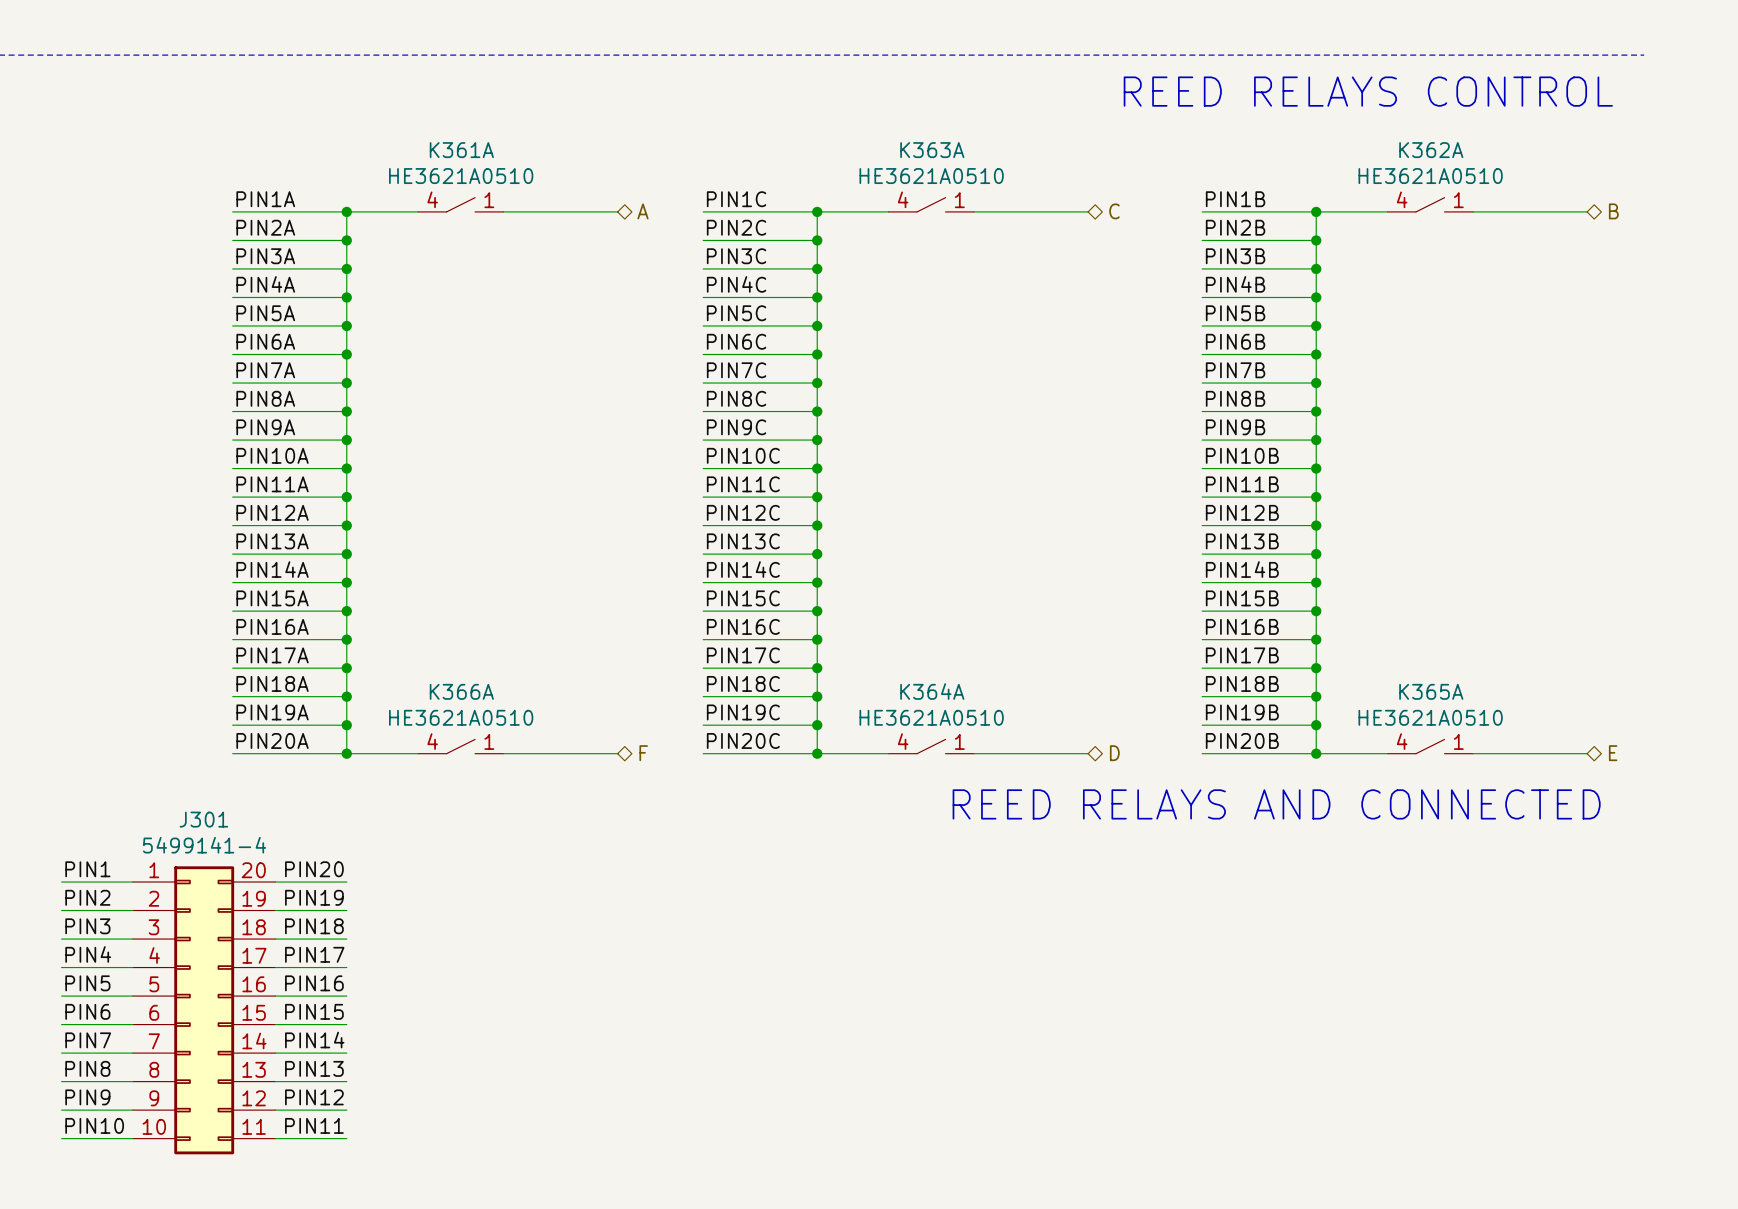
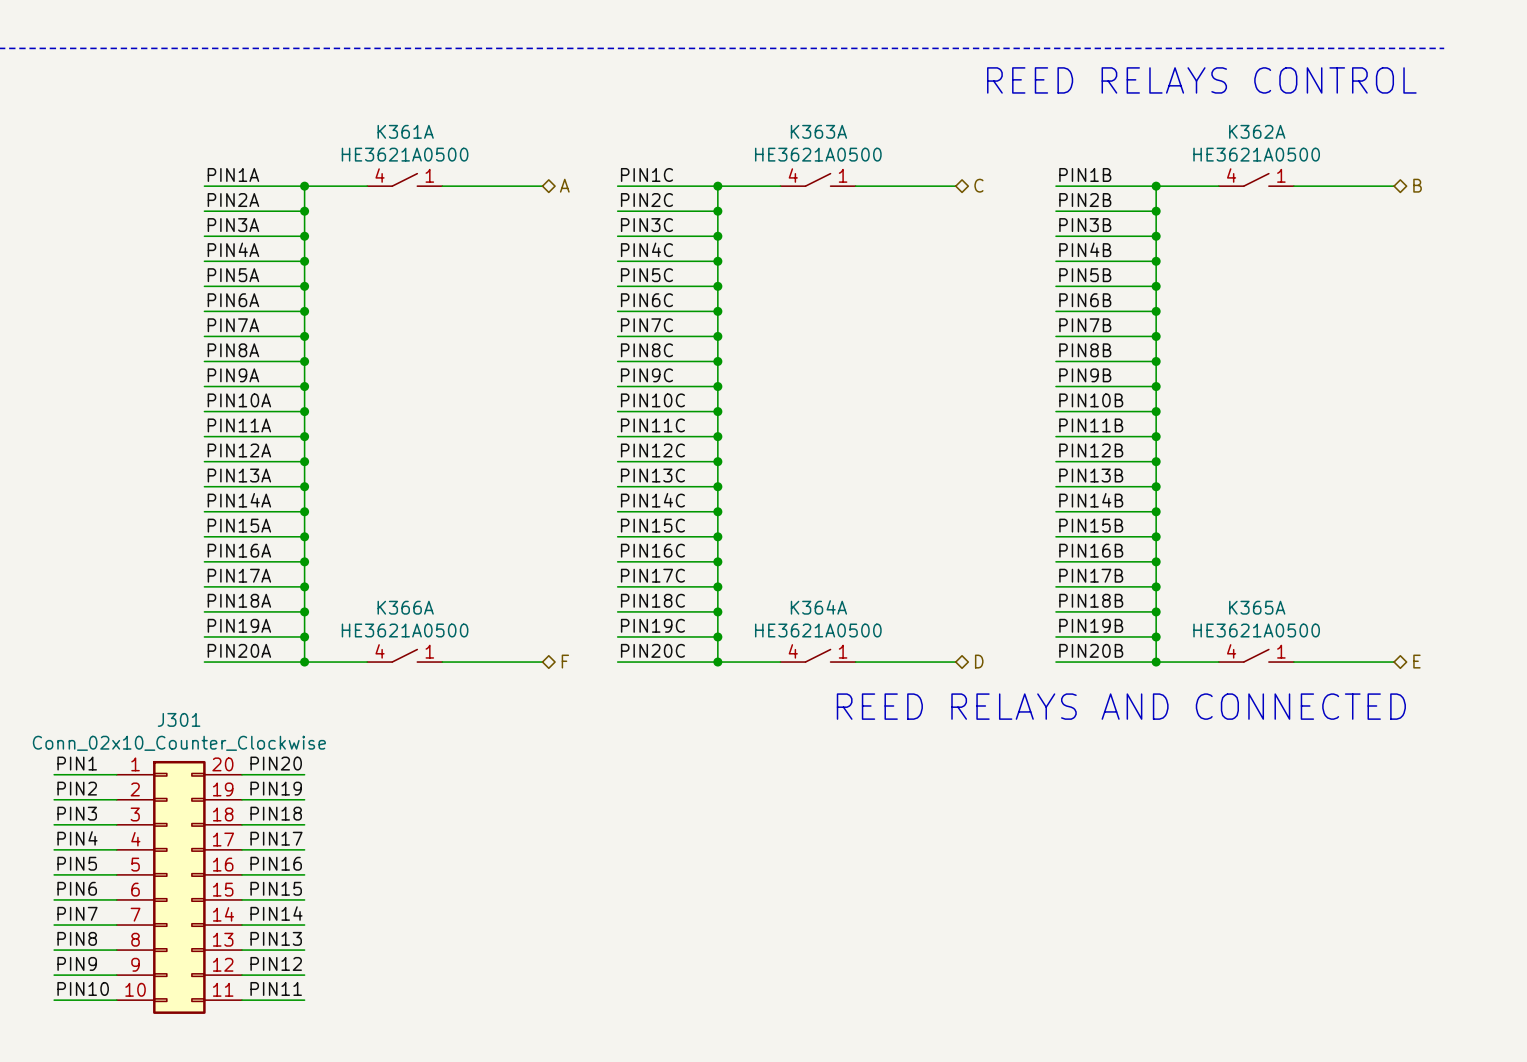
K361A value: HE3621A0510 (461, 176) -> HE3621A0500 (405, 154)
K363A value: HE3621A0510 (931, 176) -> HE3621A0500 (818, 154)
K362A value: HE3621A0510 (1430, 176) -> HE3621A0500 (1256, 154)
K366A value: HE3621A0510 (461, 717) -> HE3621A0500 (405, 630)
K364A value: HE3621A0510 (931, 717) -> HE3621A0500 (818, 630)
K365A value: HE3621A0510 (1430, 717) -> HE3621A0500 (1256, 630)
J301 value: 5499141-4 (204, 845) -> Conn_02x10_Counter_Clockwise (179, 743)

